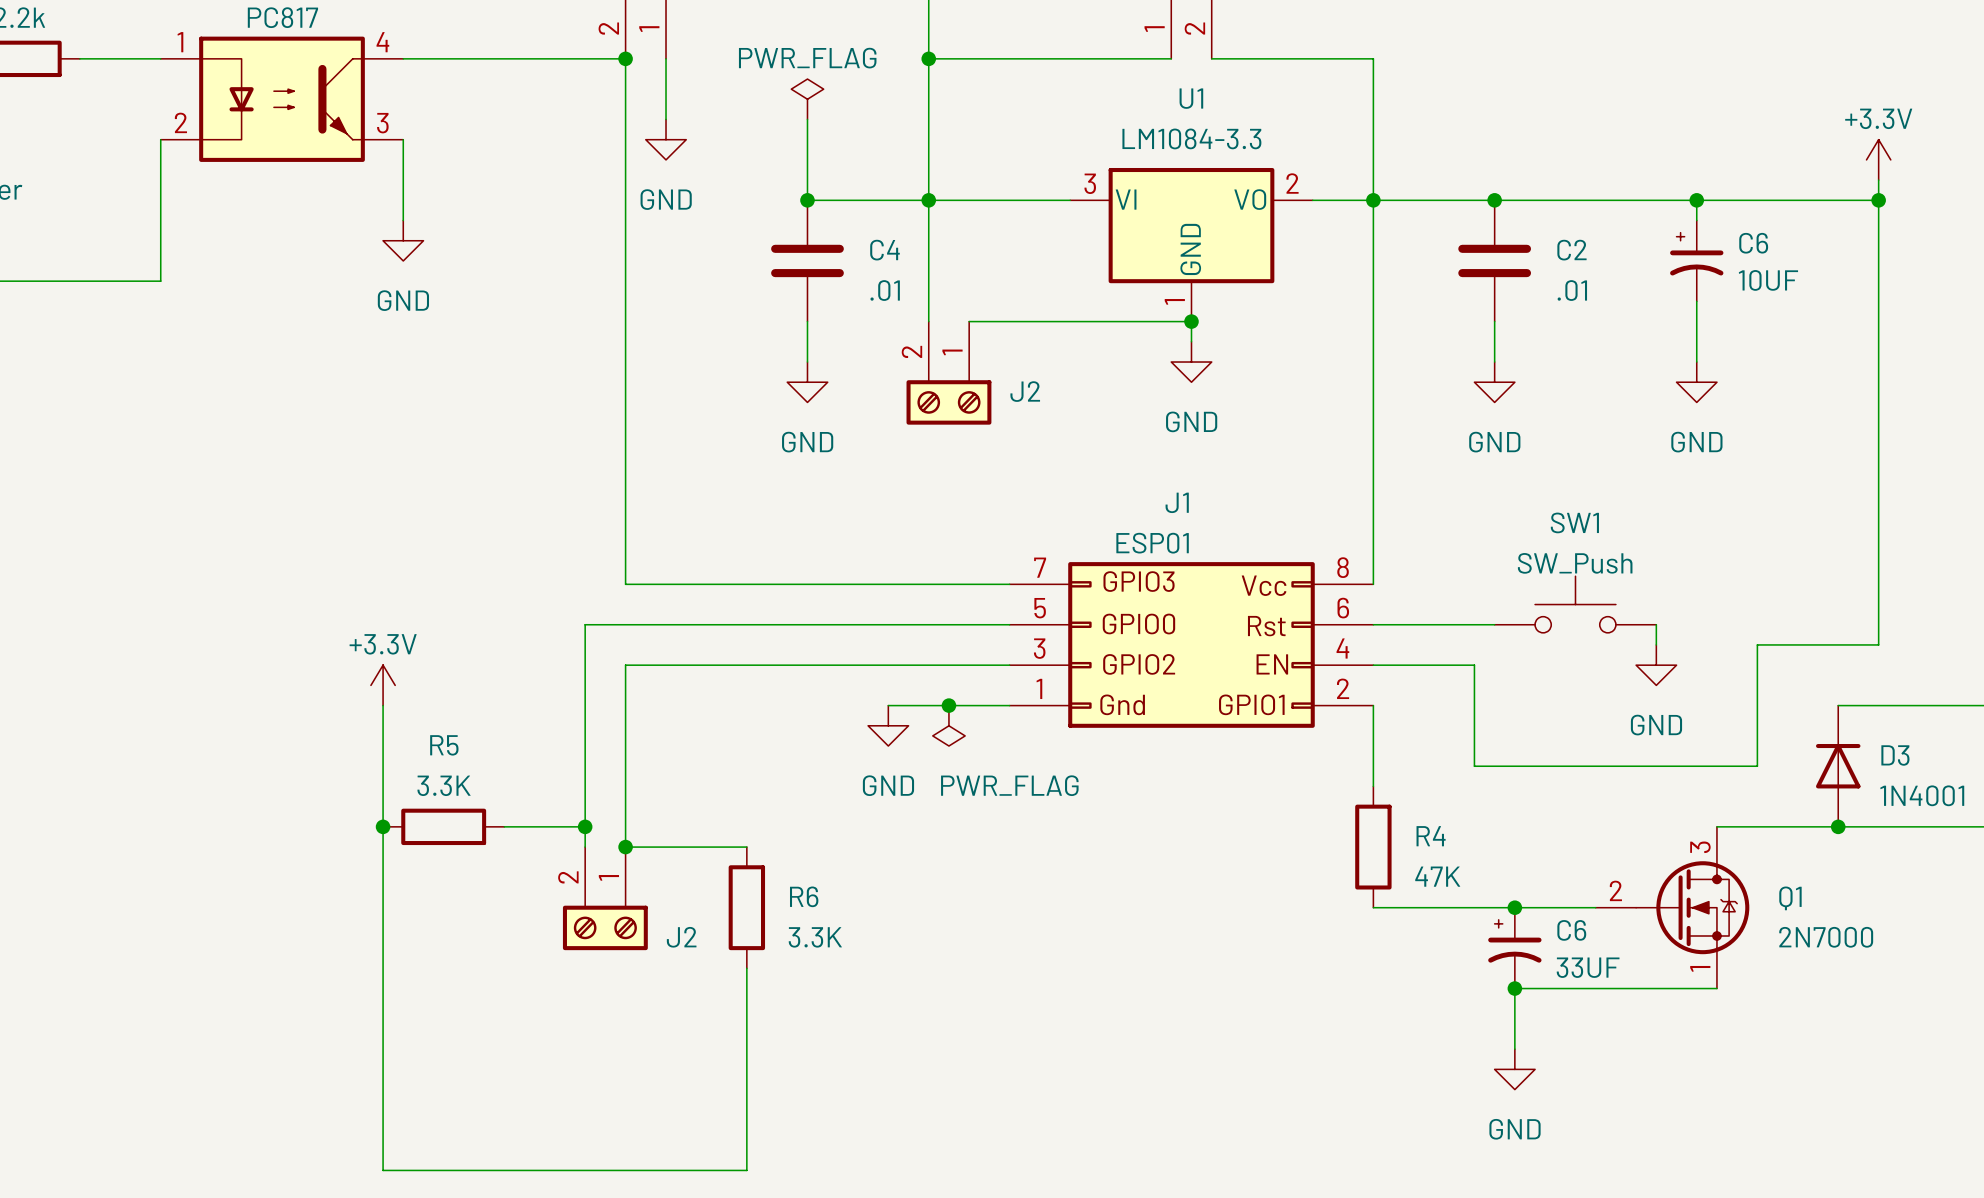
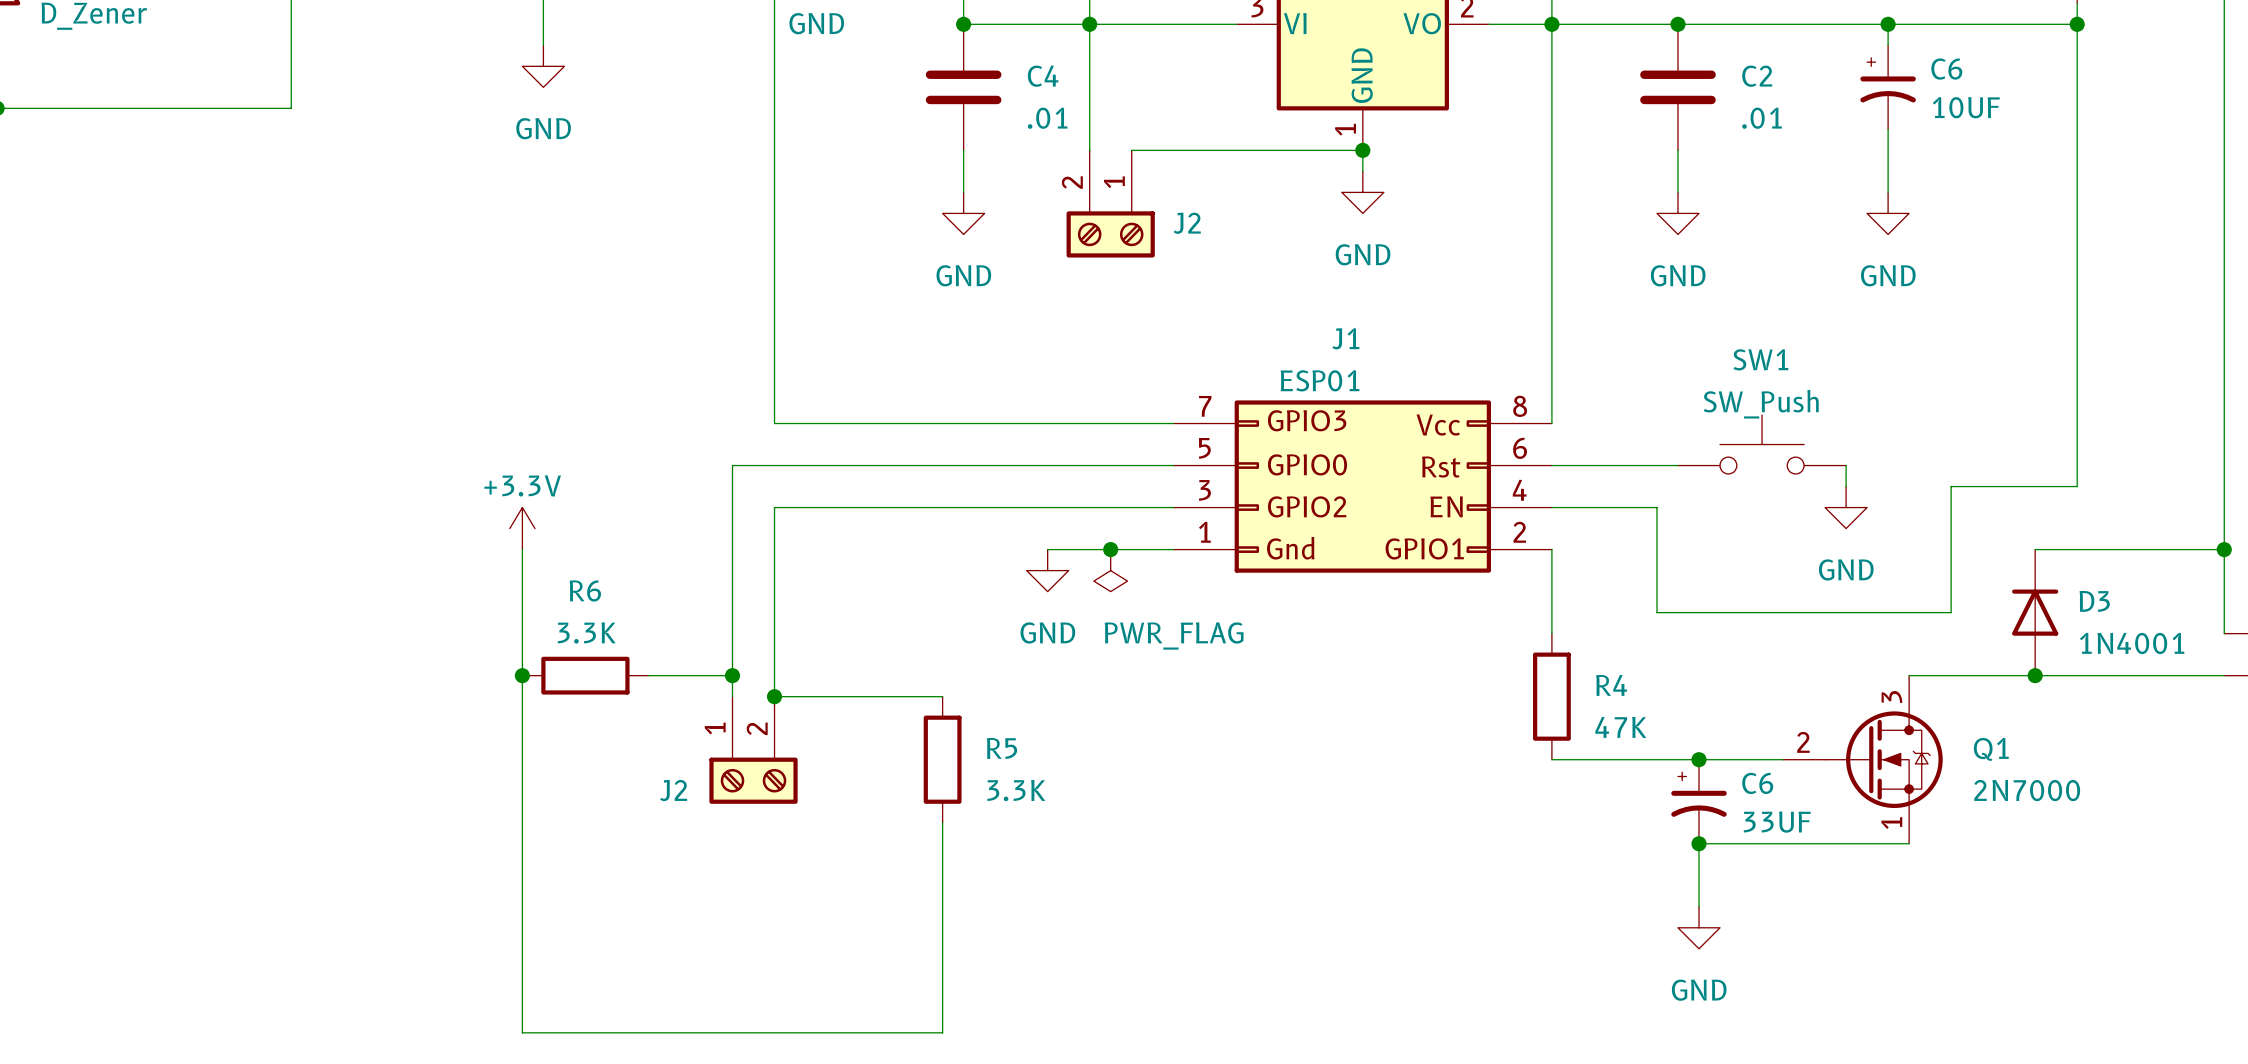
R5 name: R5 (444, 745) -> R6 (585, 590)
wire: none -> (900, 696) (942, 696)
R6: 3.3K (746, 907) -> none
R5: none -> 3.3K (942, 759)
J2 flip: as is (605, 927) -> left-right (753, 780)
wire: (746, 968) (746, 1170) -> (942, 822) (942, 1032) (900, 1032)

